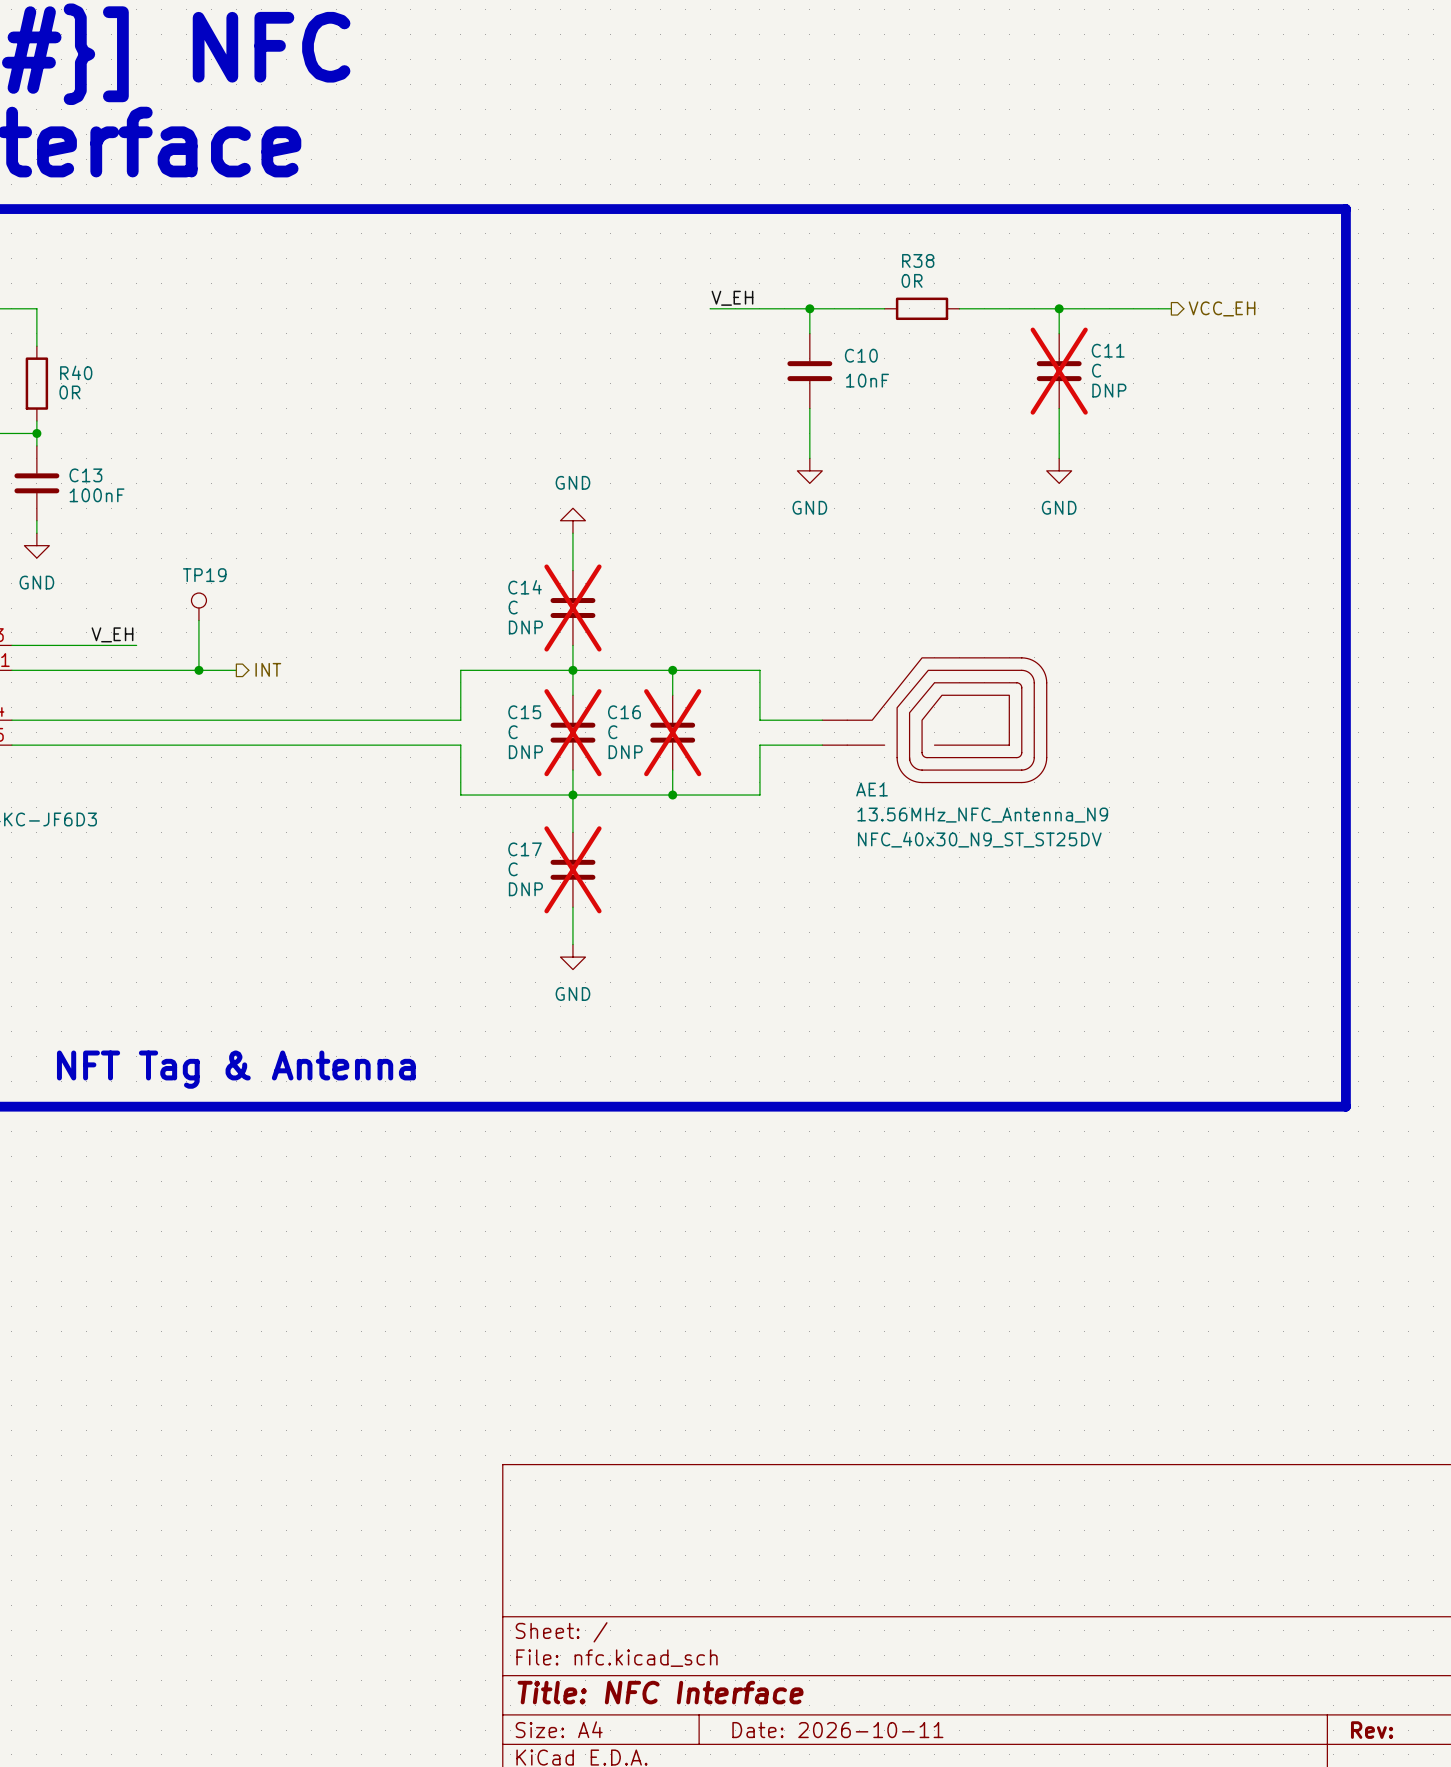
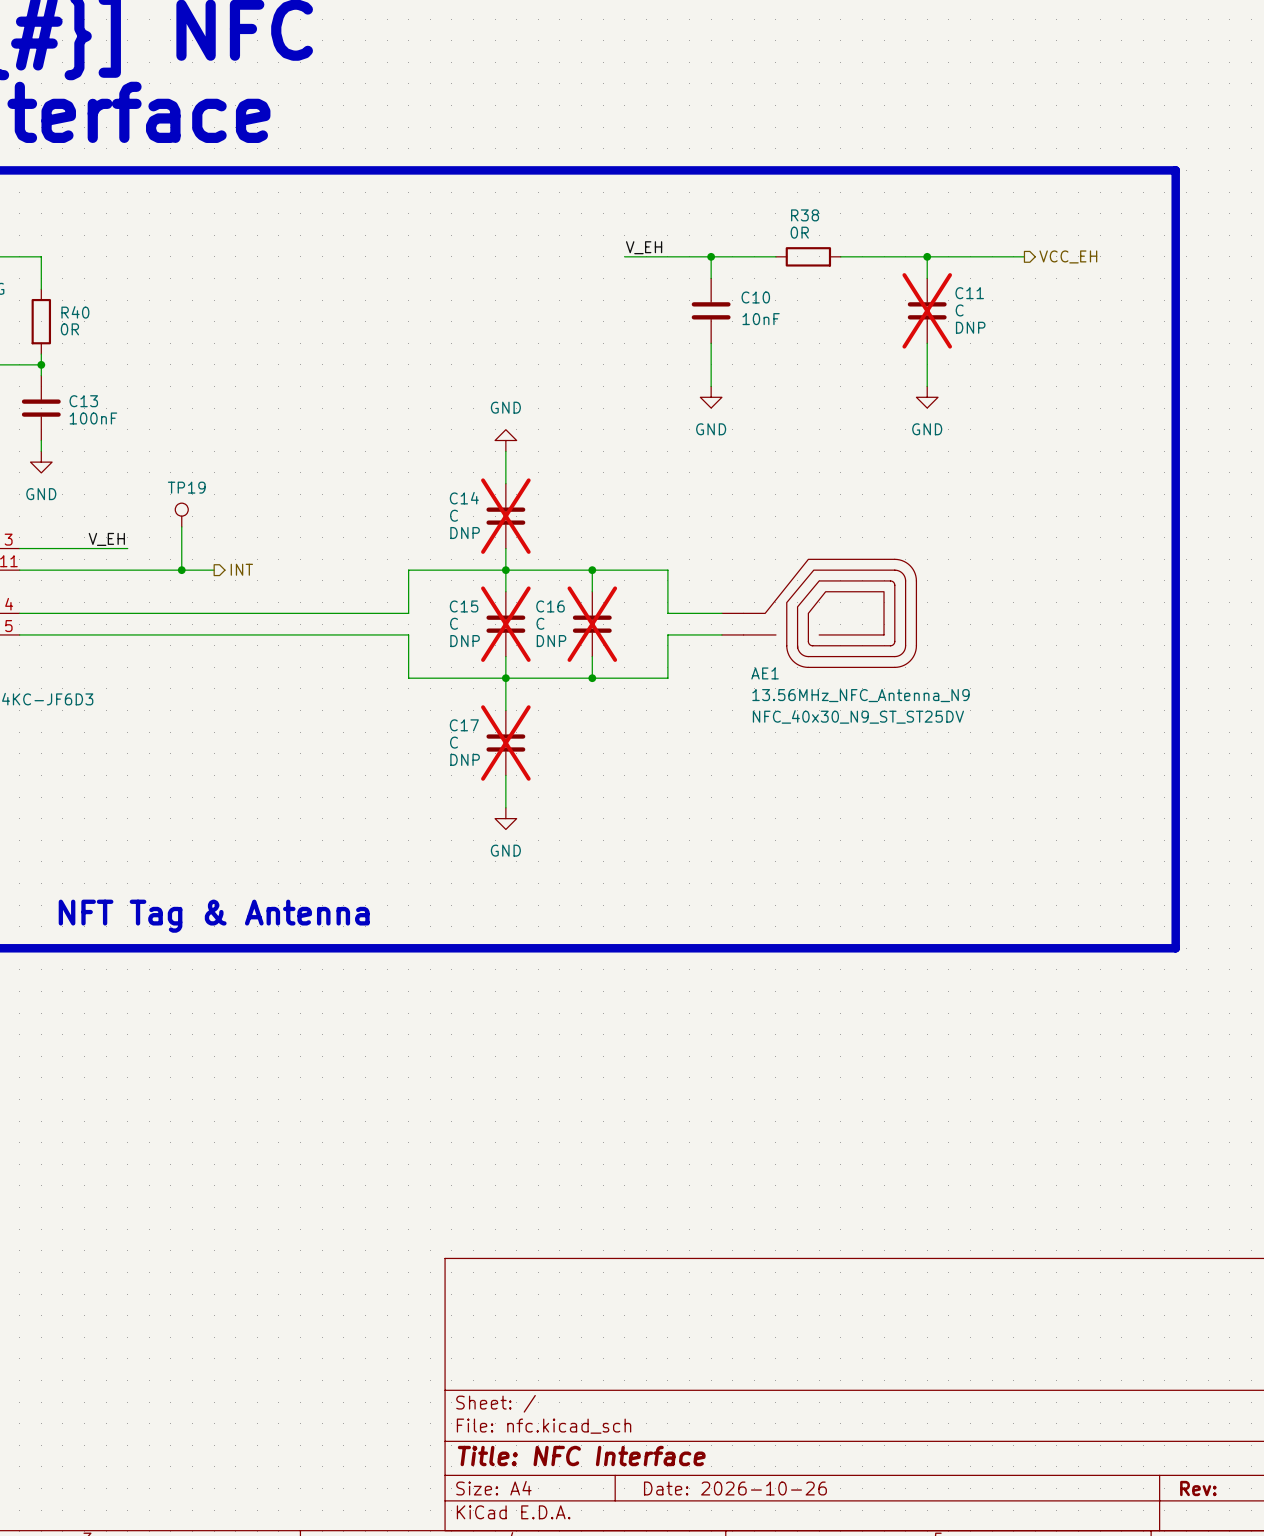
title block: Date: 2026-10-11 (837, 1730) -> Date: 2026-10-26 (735, 1488)

